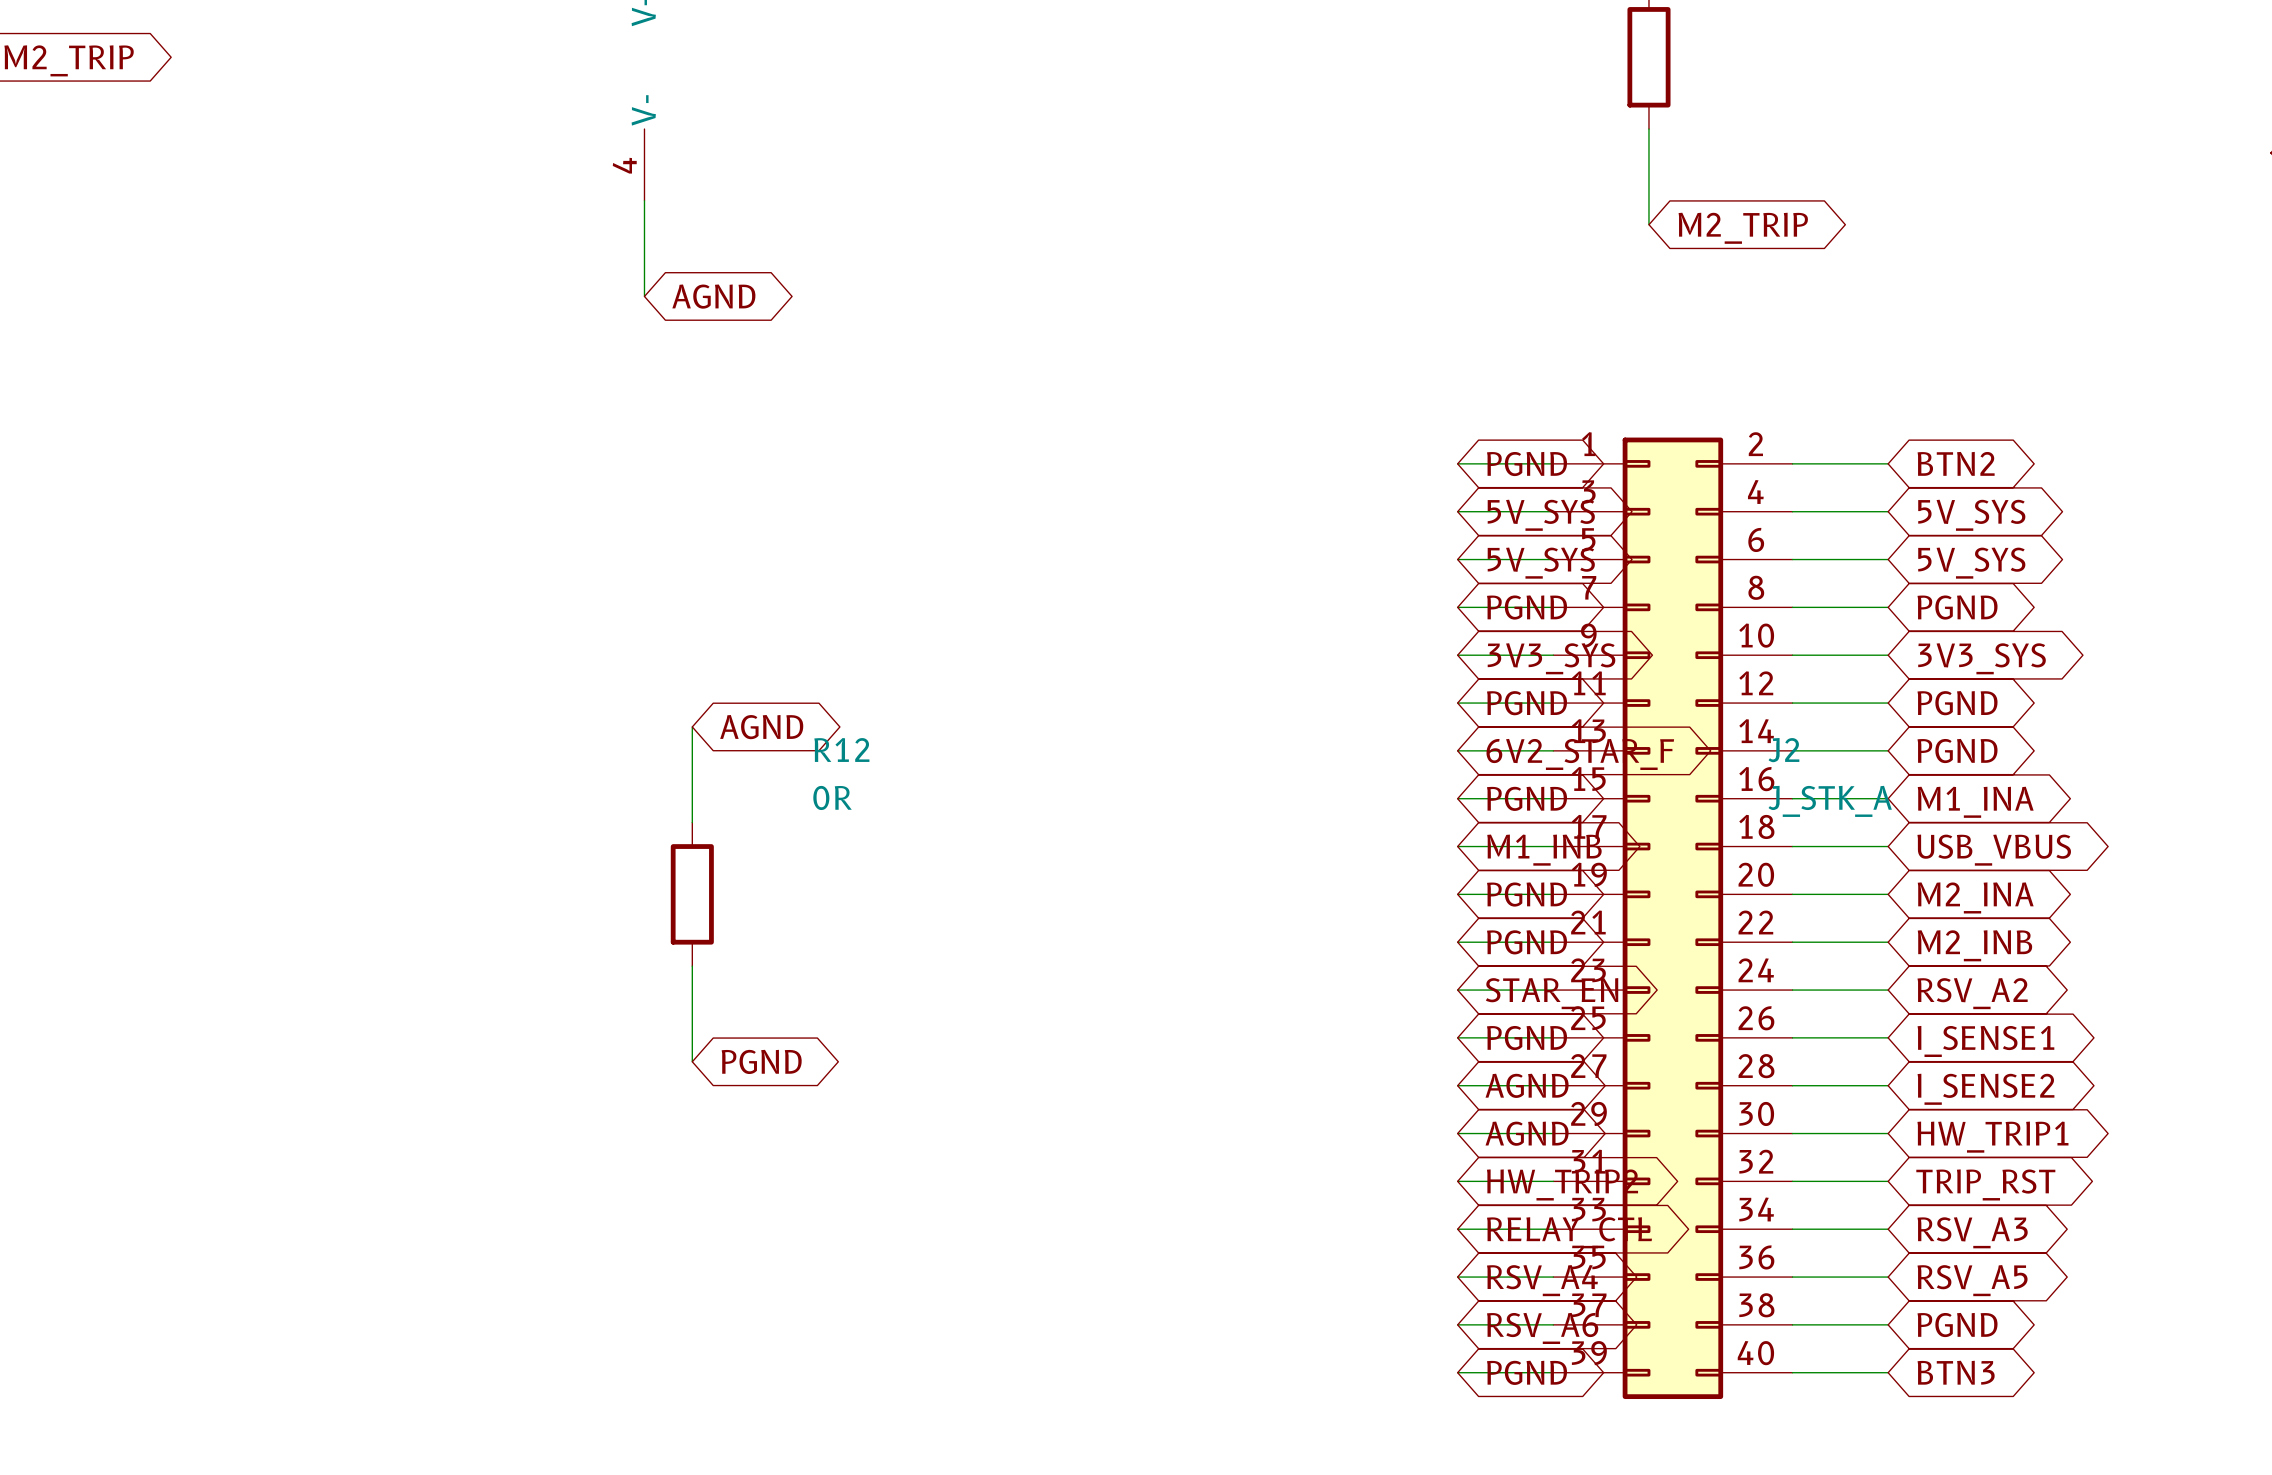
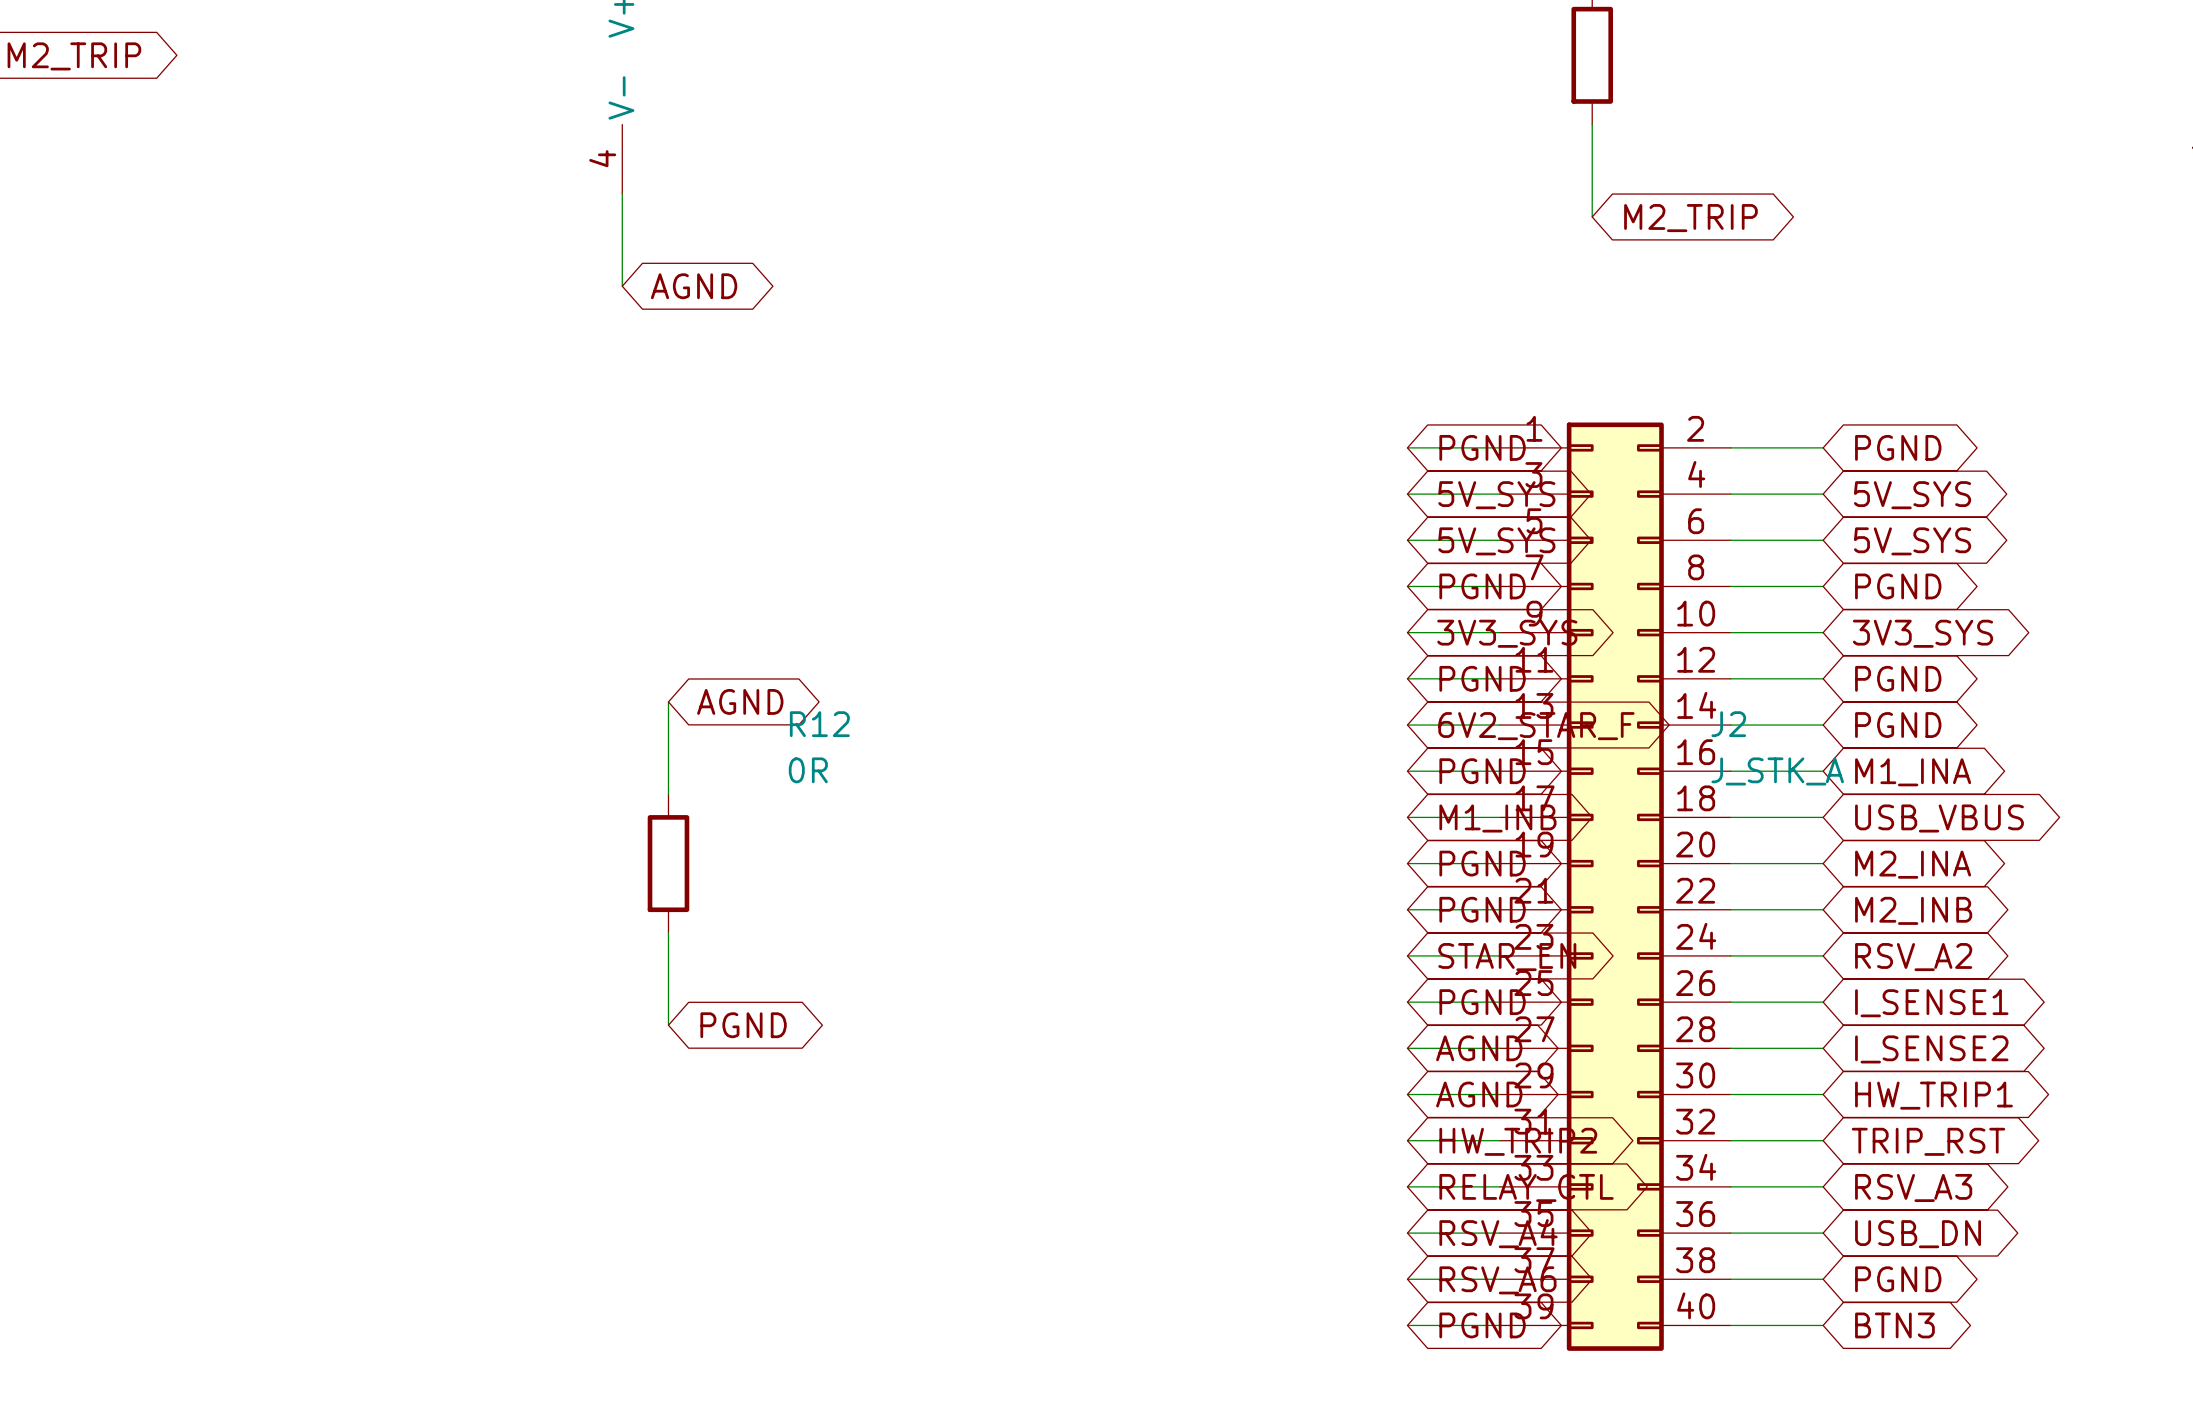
global label: BTN2 (1956, 463) -> PGND (1898, 447)
global label: RSV_A5 (1972, 1280) -> USB_DN (1918, 1234)

